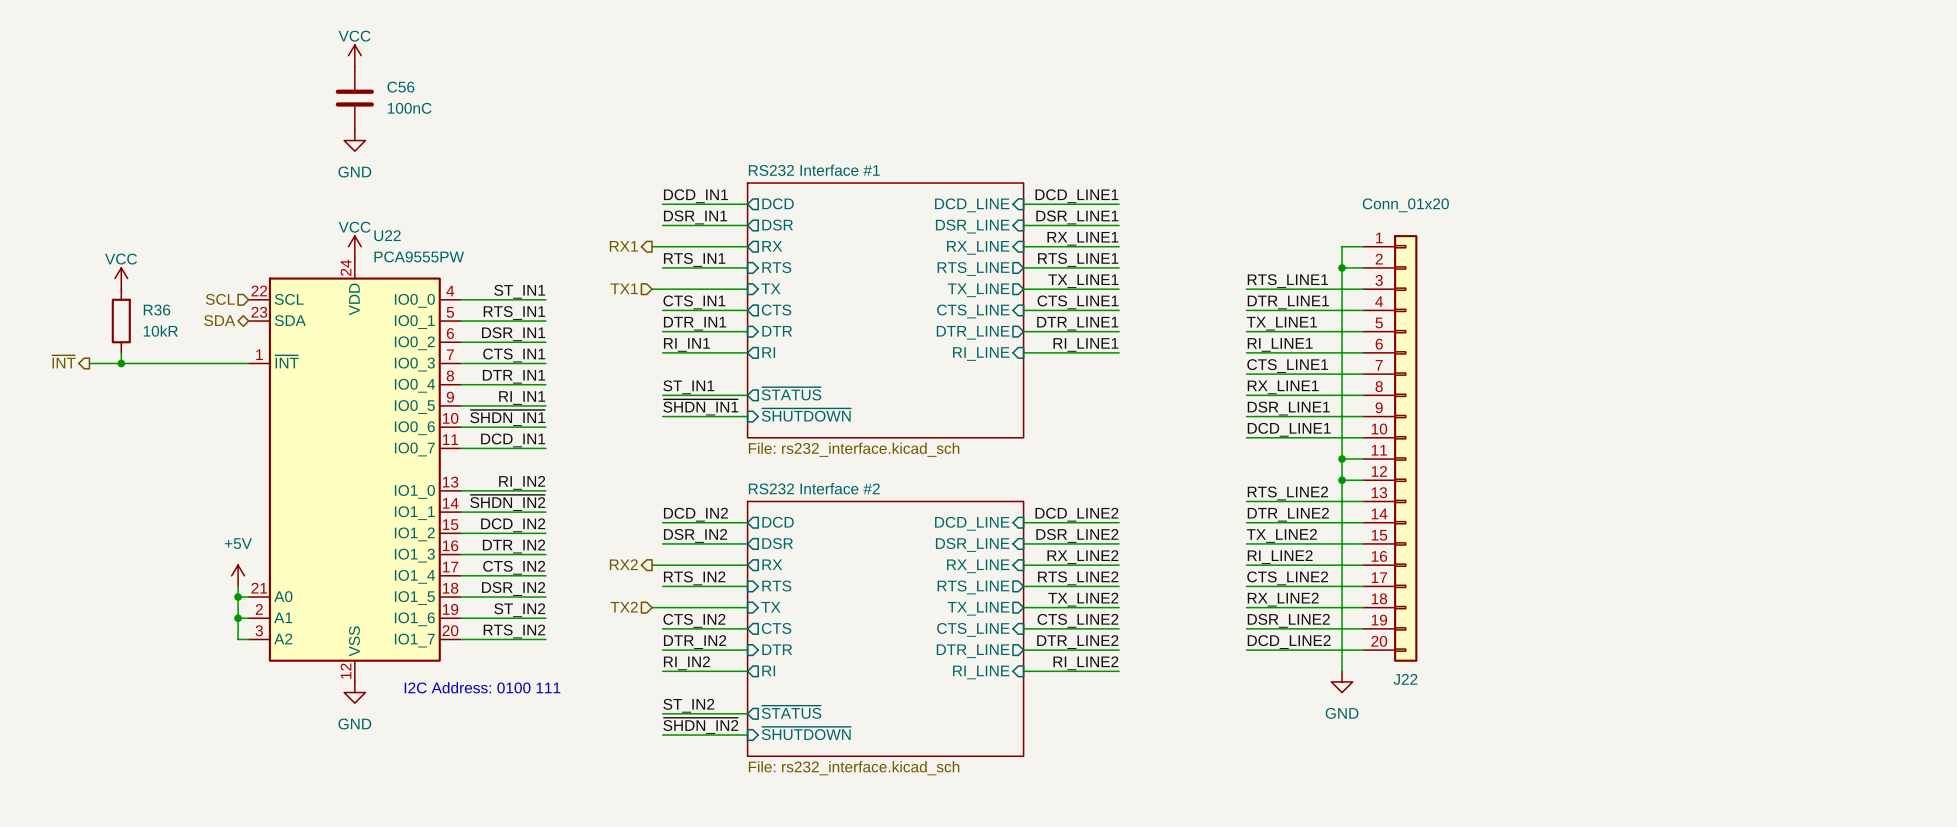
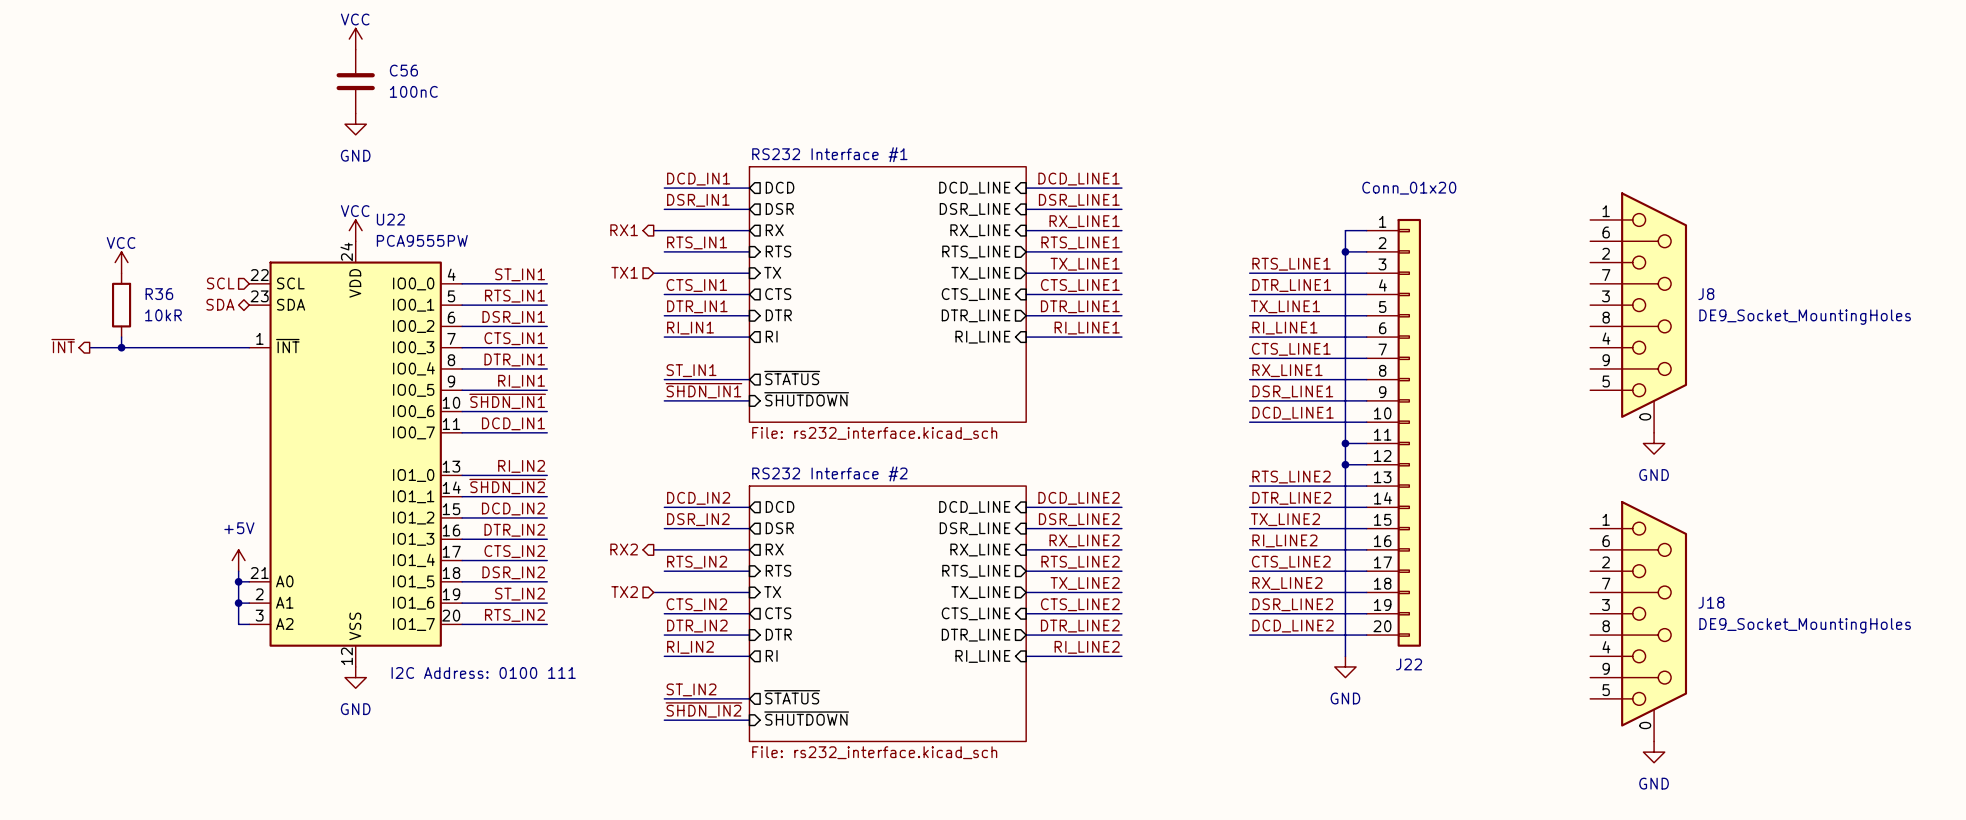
J8: none -> DE9_Socket_MountingHoles (1638, 312)
power symbol: none -> GND (1654, 443)
J18: none -> DE9_Socket_MountingHoles (1638, 621)
power symbol: none -> GND (1654, 752)

